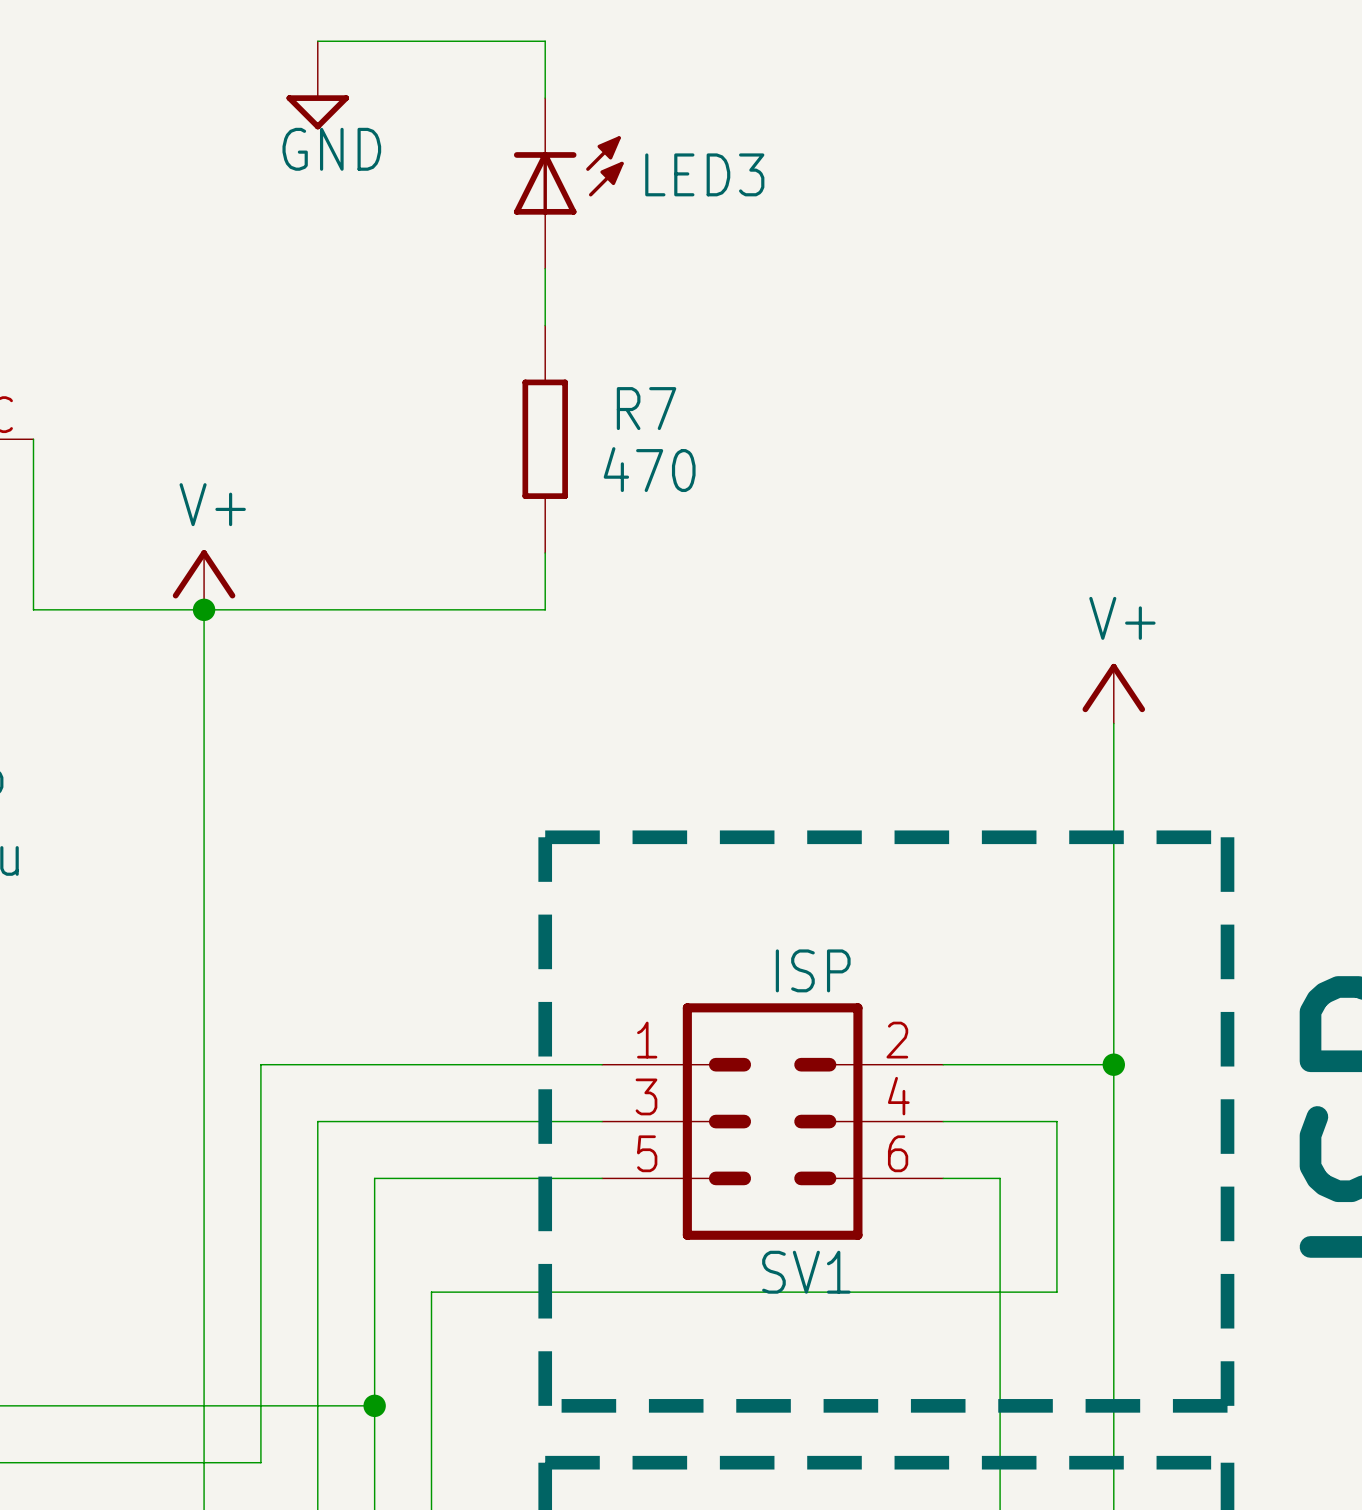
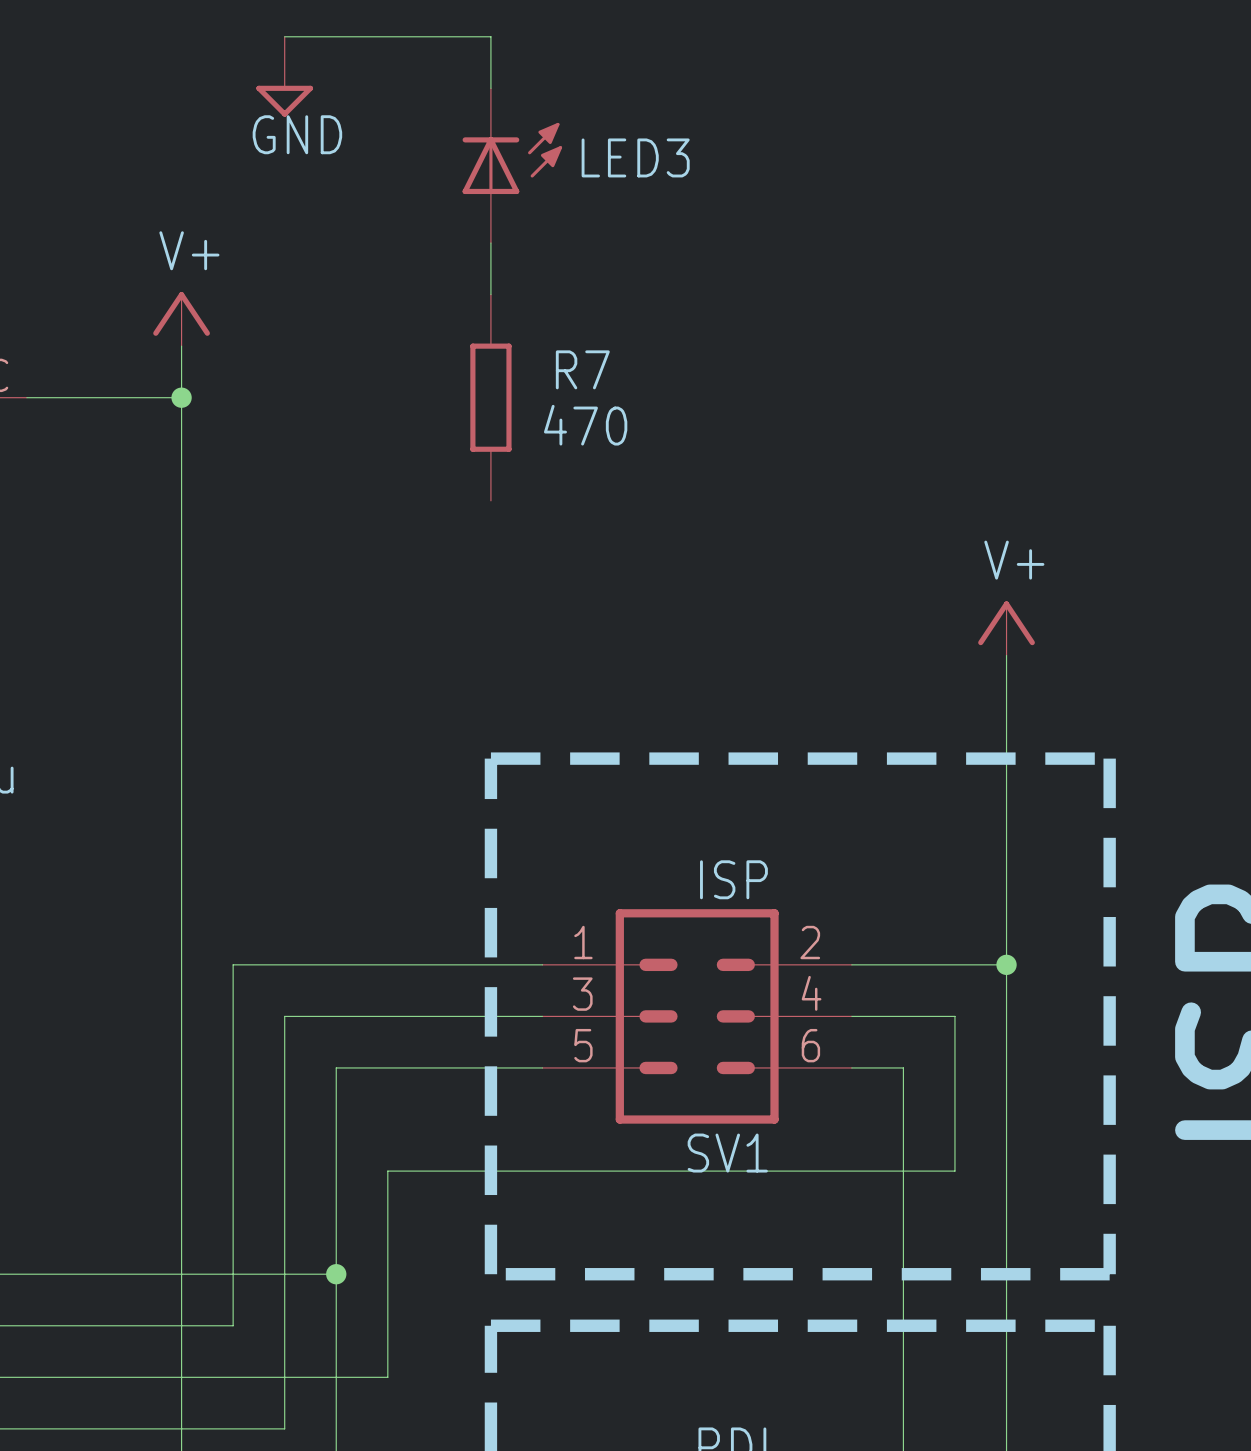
wire: none -> (181, 346) (181, 552)
wire: (33, 439) (33, 609) (545, 609) (545, 552) -> (26, 397) (181, 397)
junction: none -> (181, 397)
power symbol position: V+ (204, 579) -> V+ (181, 319)
junction: (204, 609) -> none

